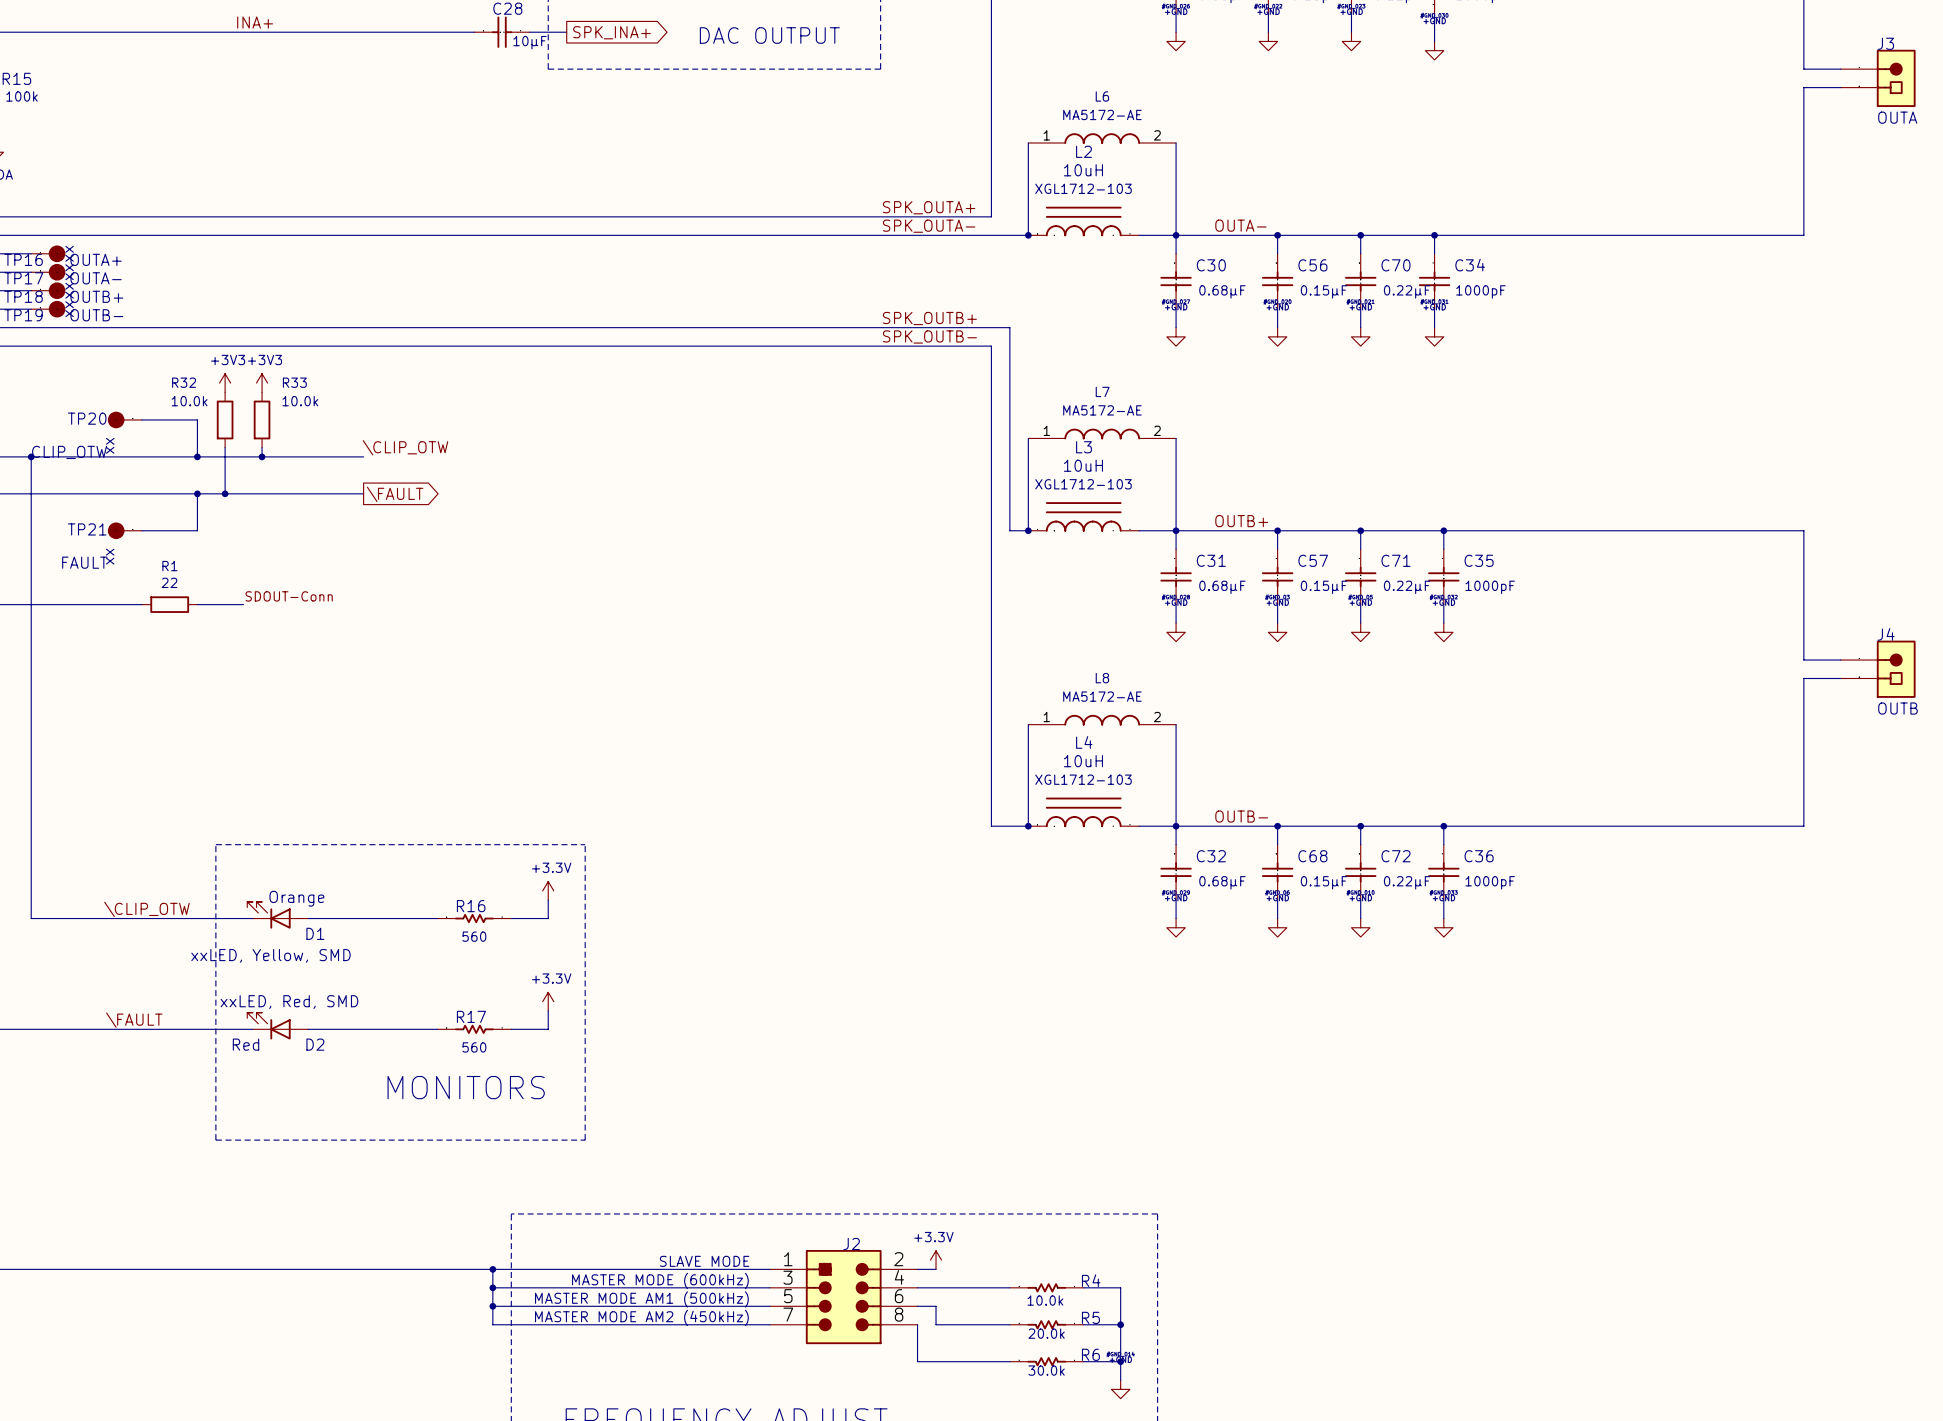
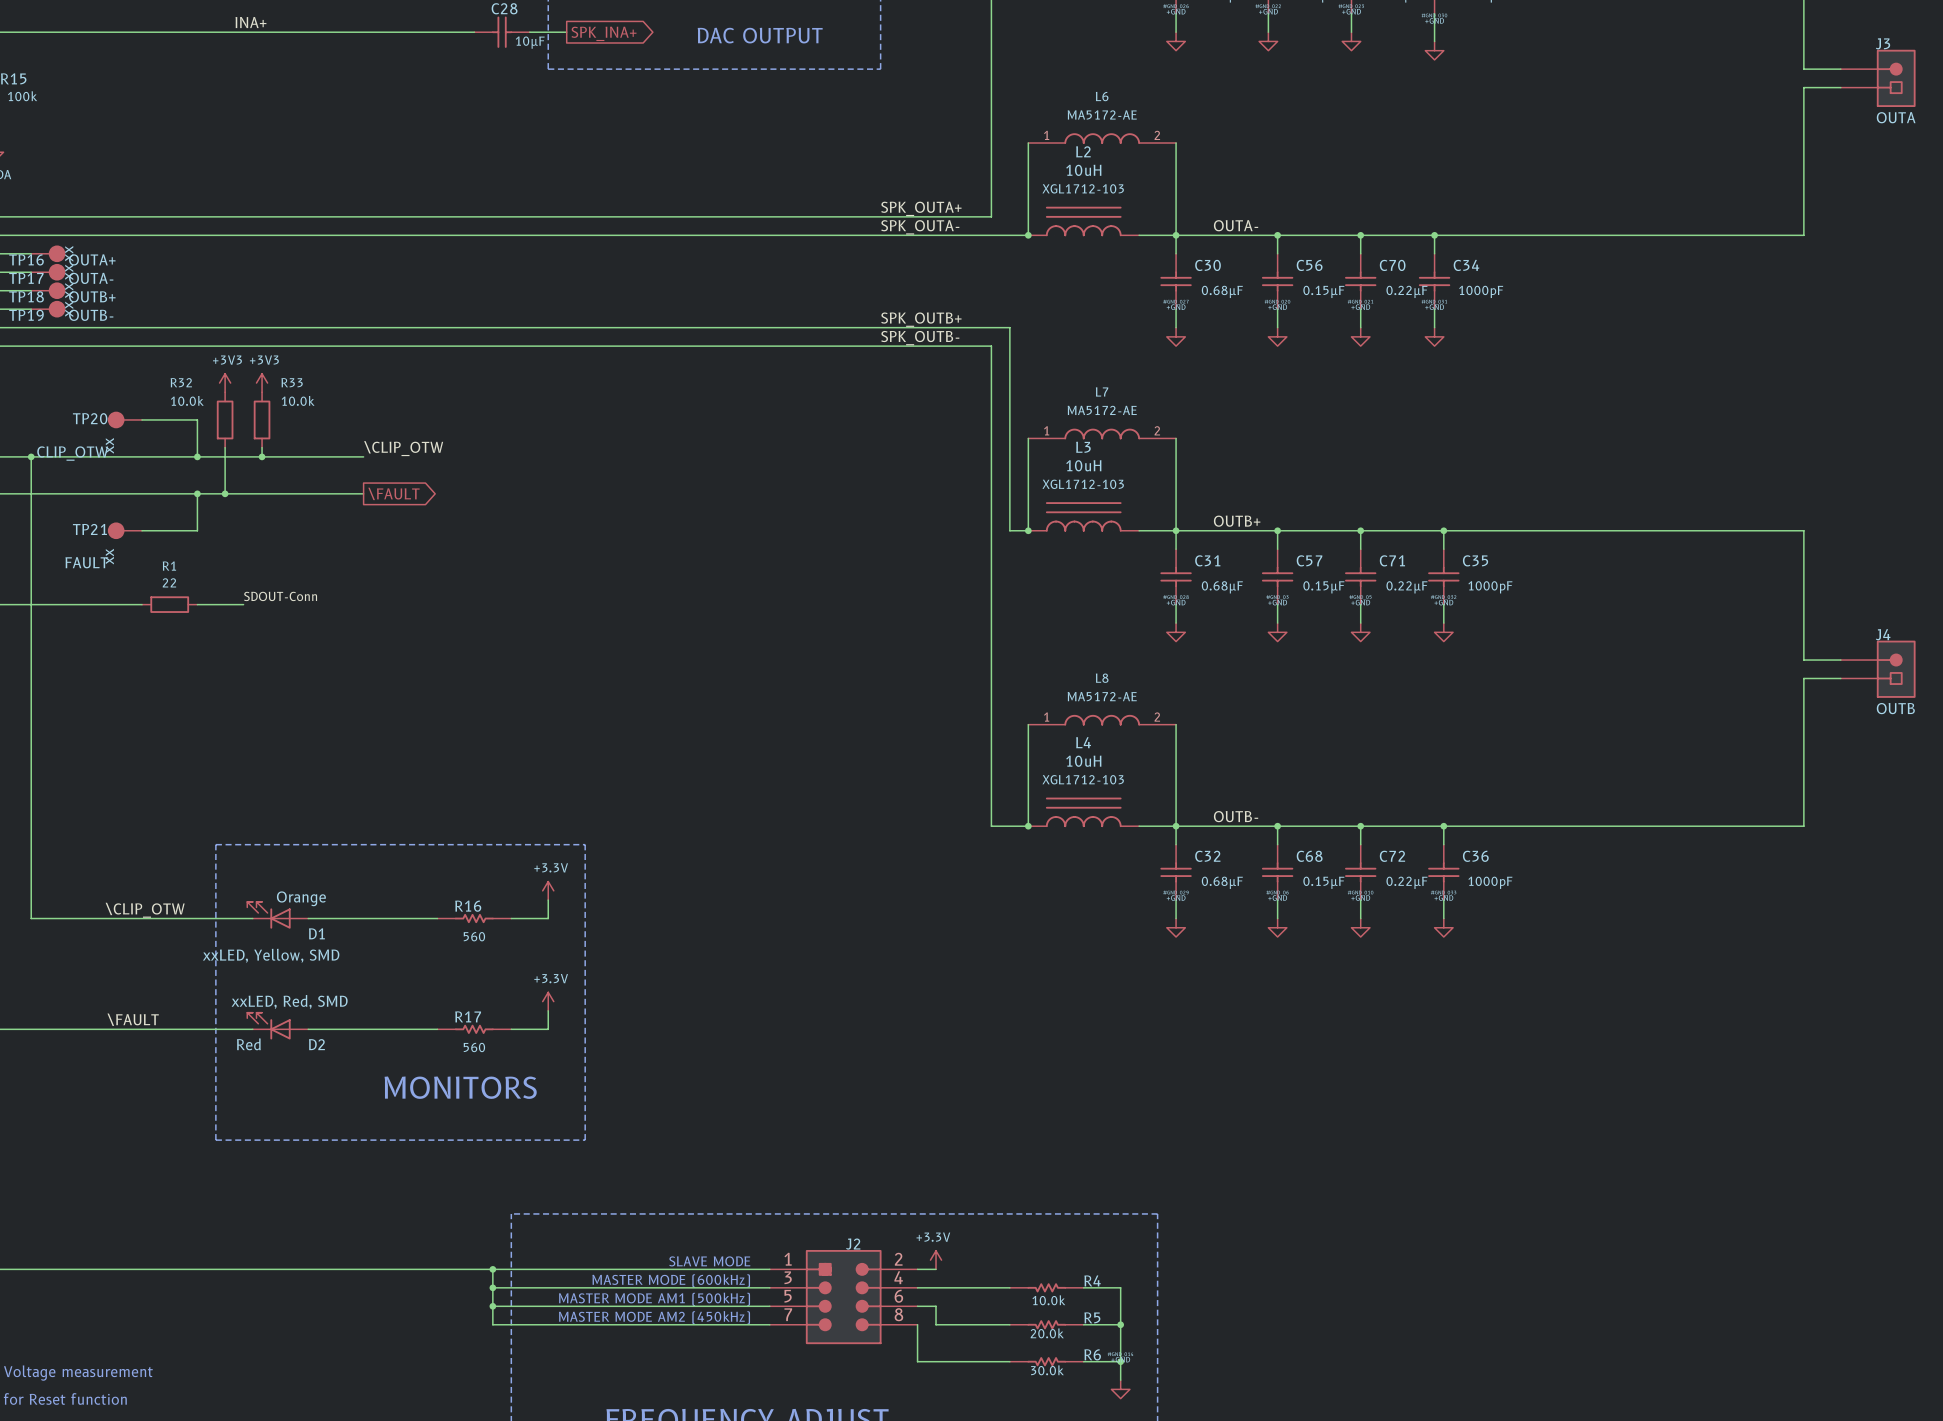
text: none -> Voltage measurement (78, 1373)
text: none -> for Reset function (65, 1398)

